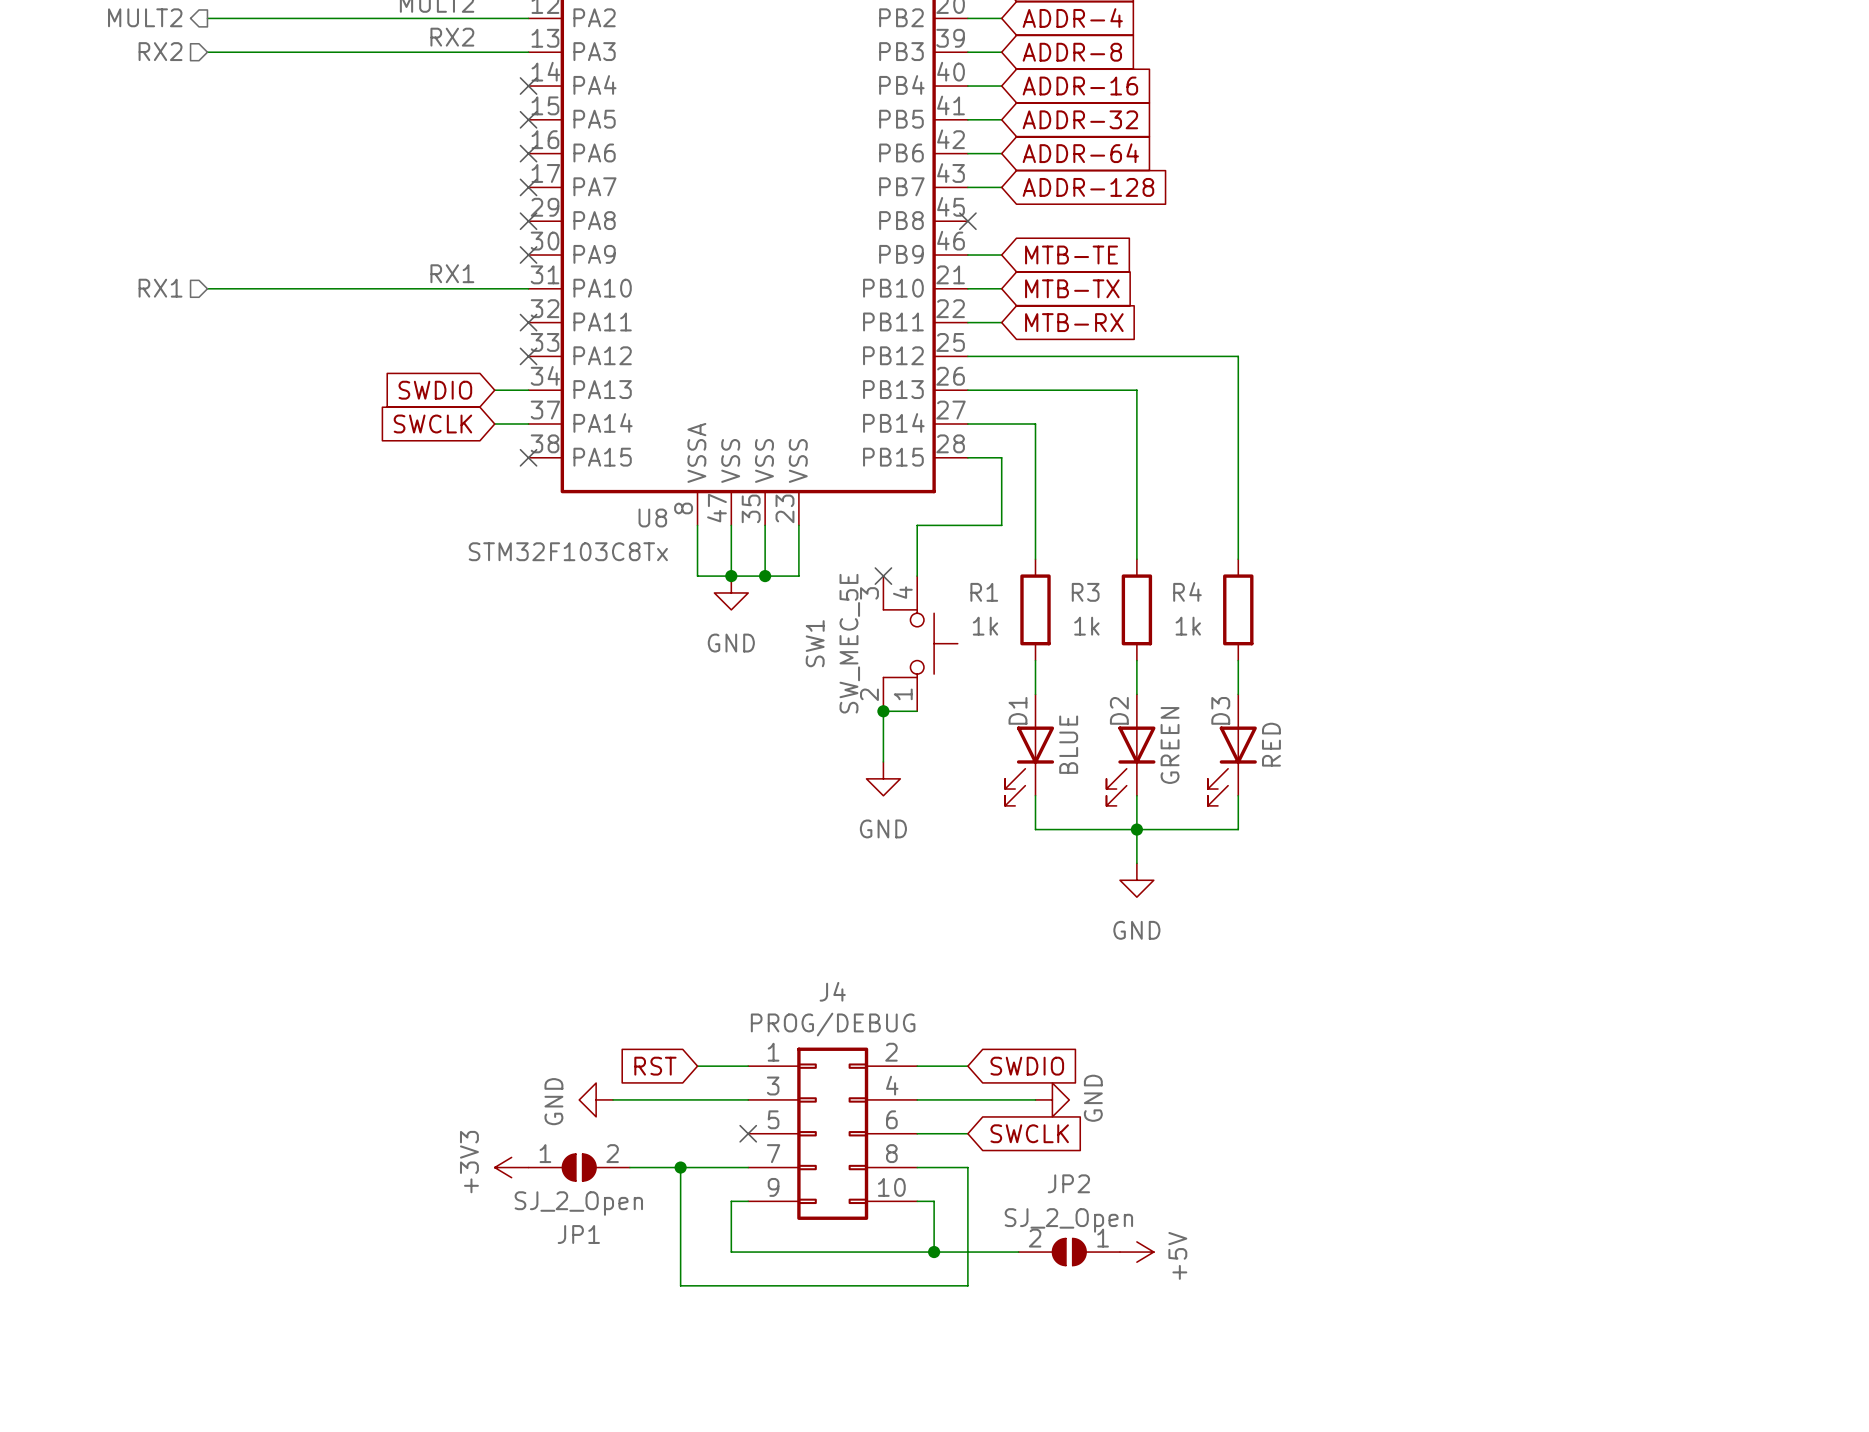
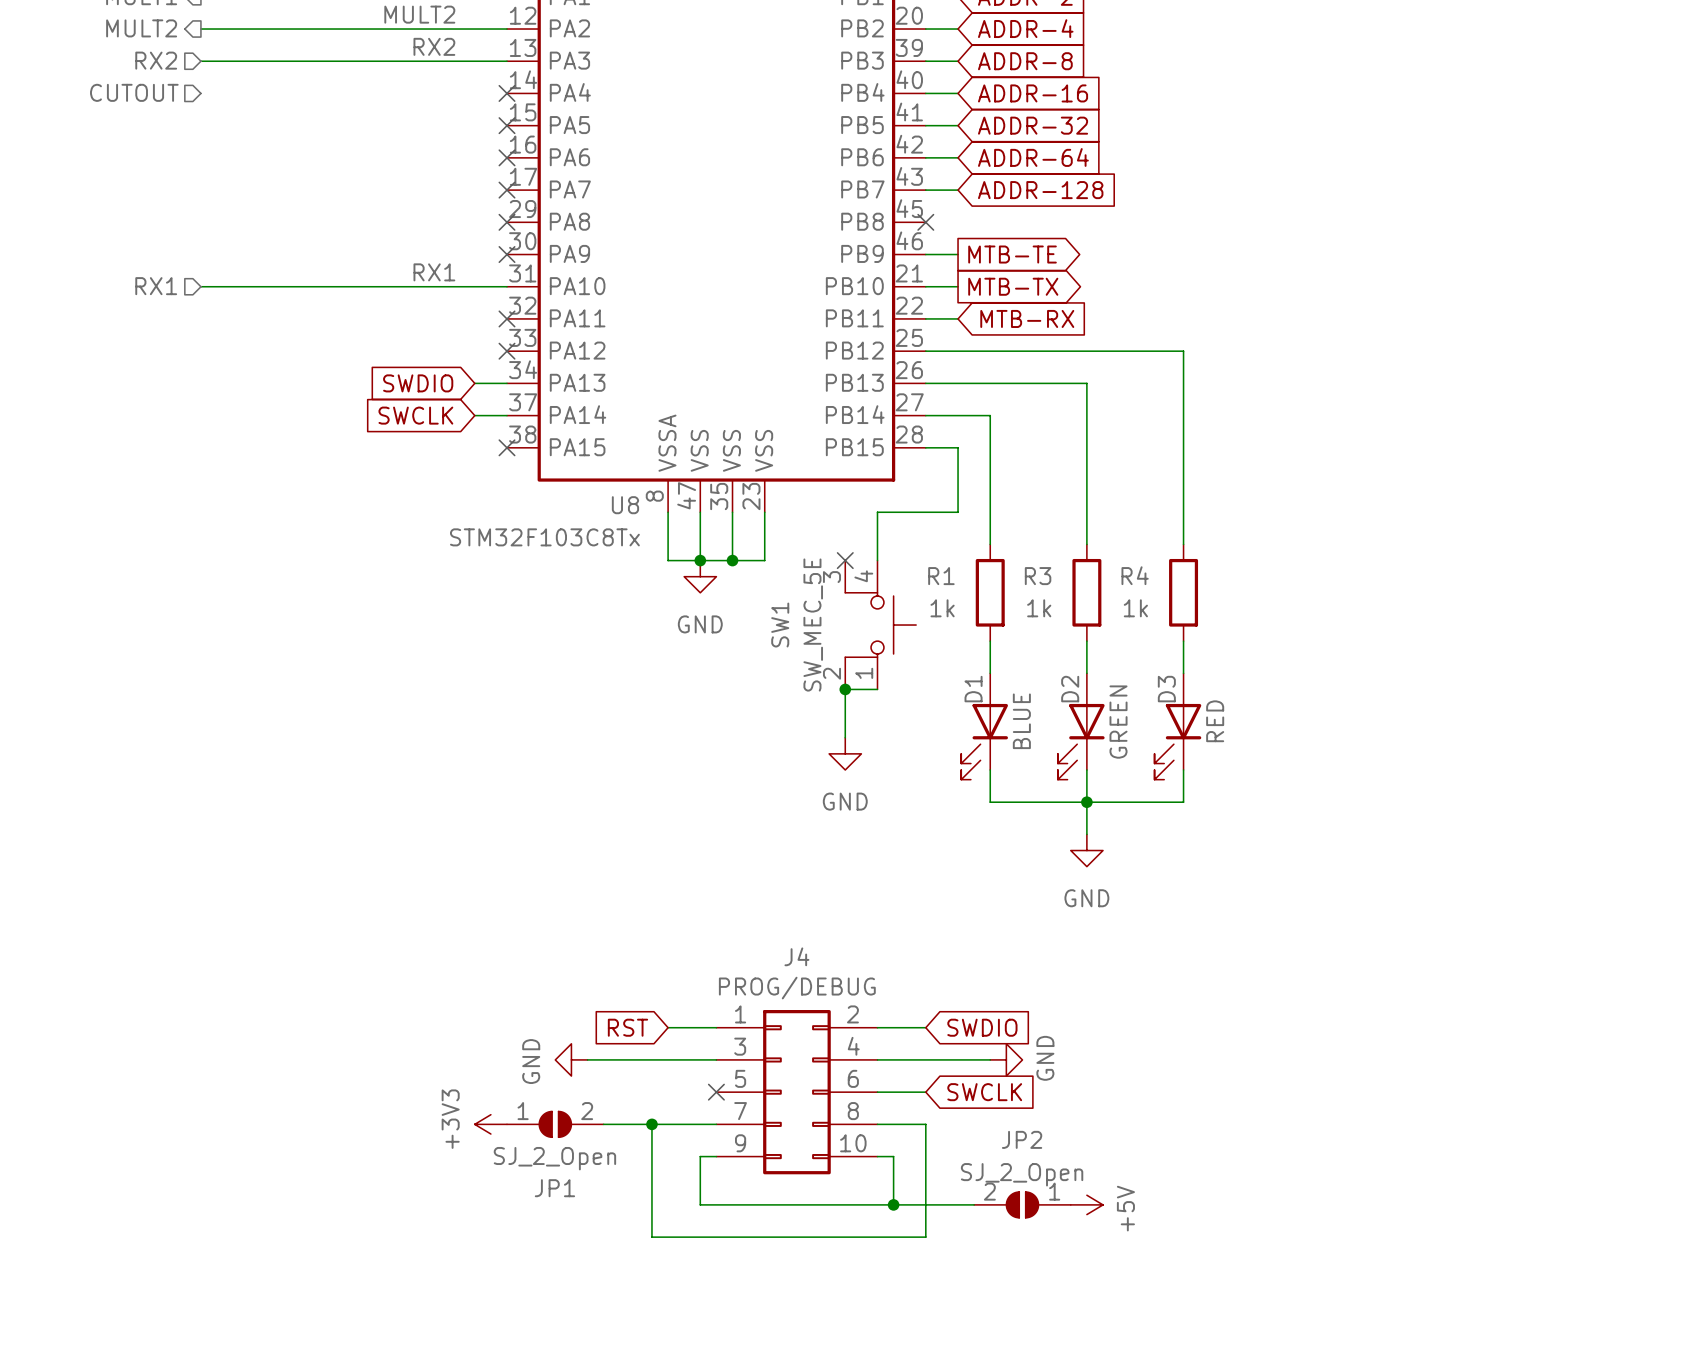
hierarchical label: none -> CUTOUT (134, 92)
global label shape: input (1071, 255) -> output (1012, 254)
global label shape: input (1072, 288) -> output (1013, 286)

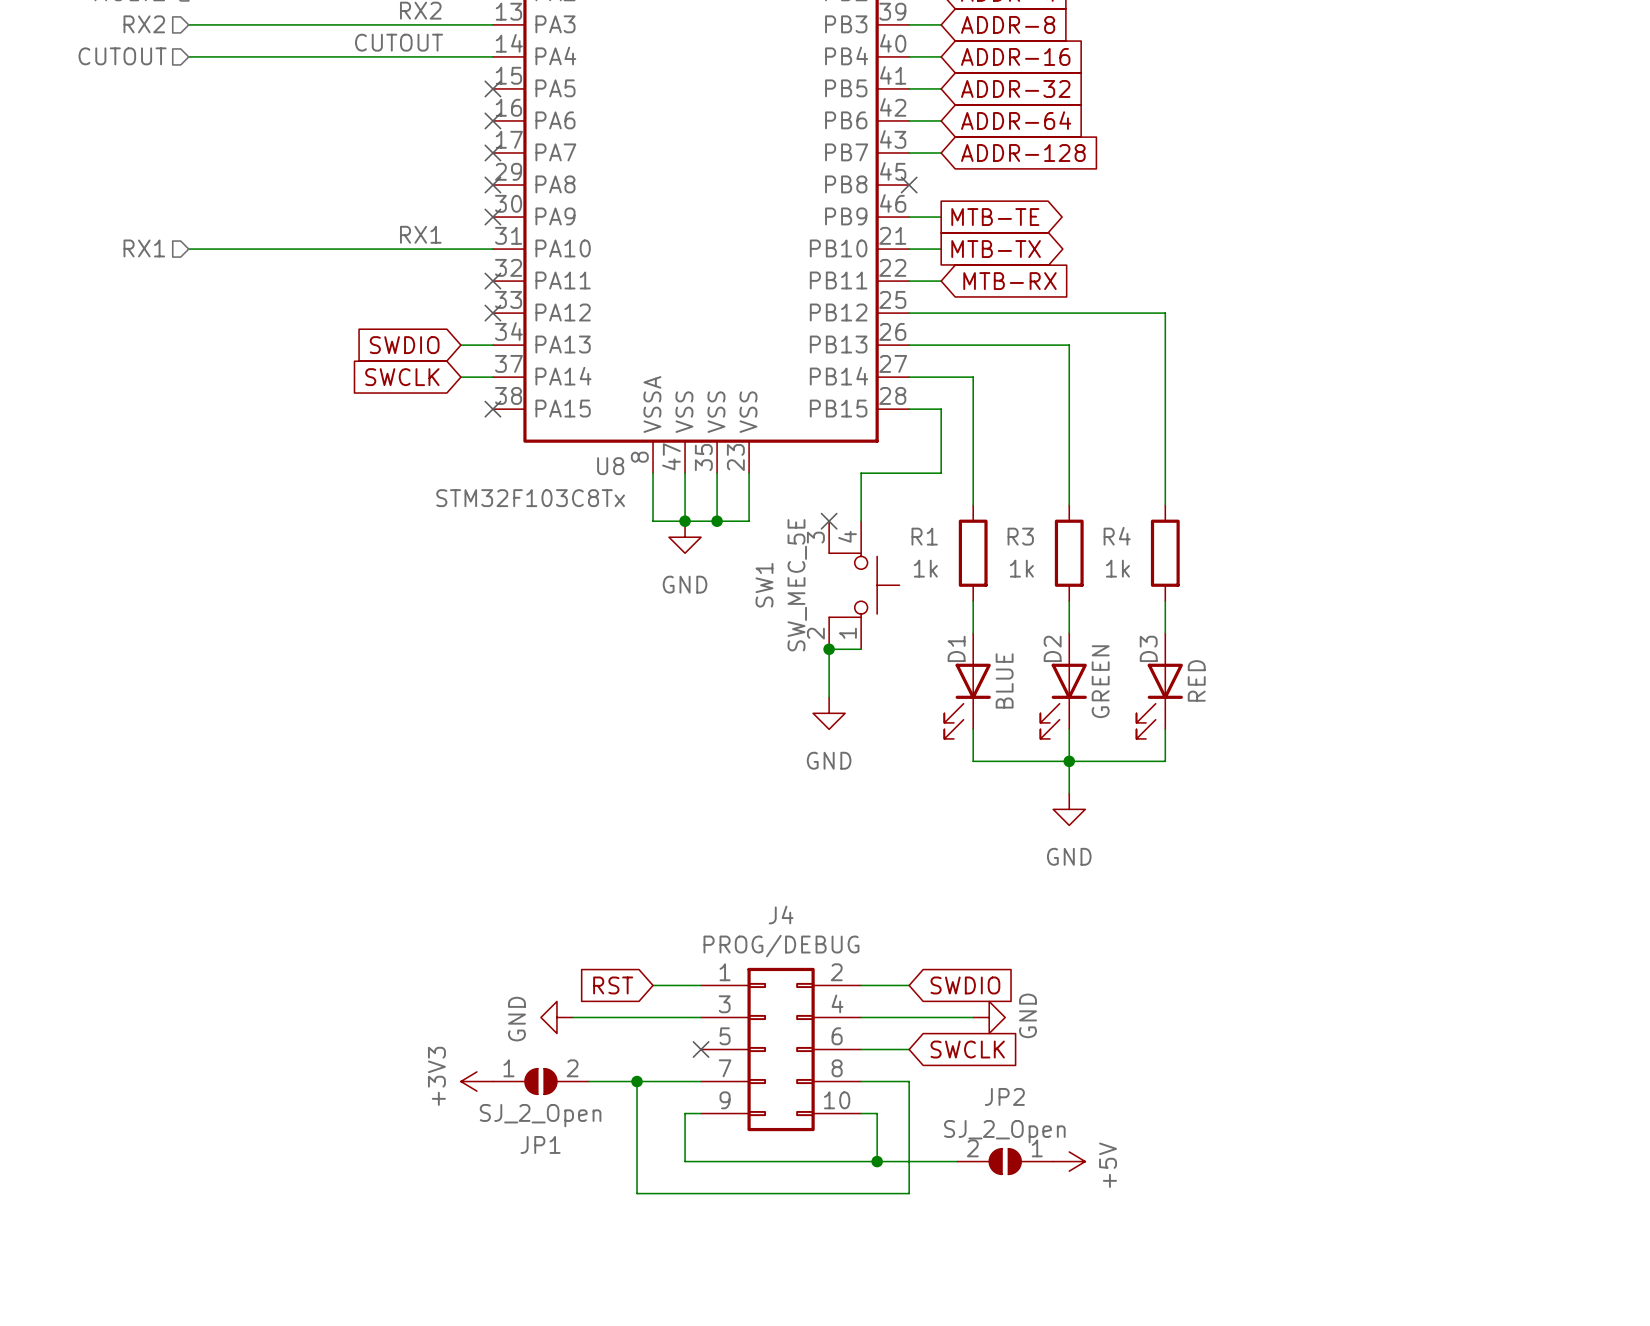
label: none -> CUTOUT (399, 42)
wire: none -> (188, 56) (492, 56)
no-connect mark: (507, 93) -> none

